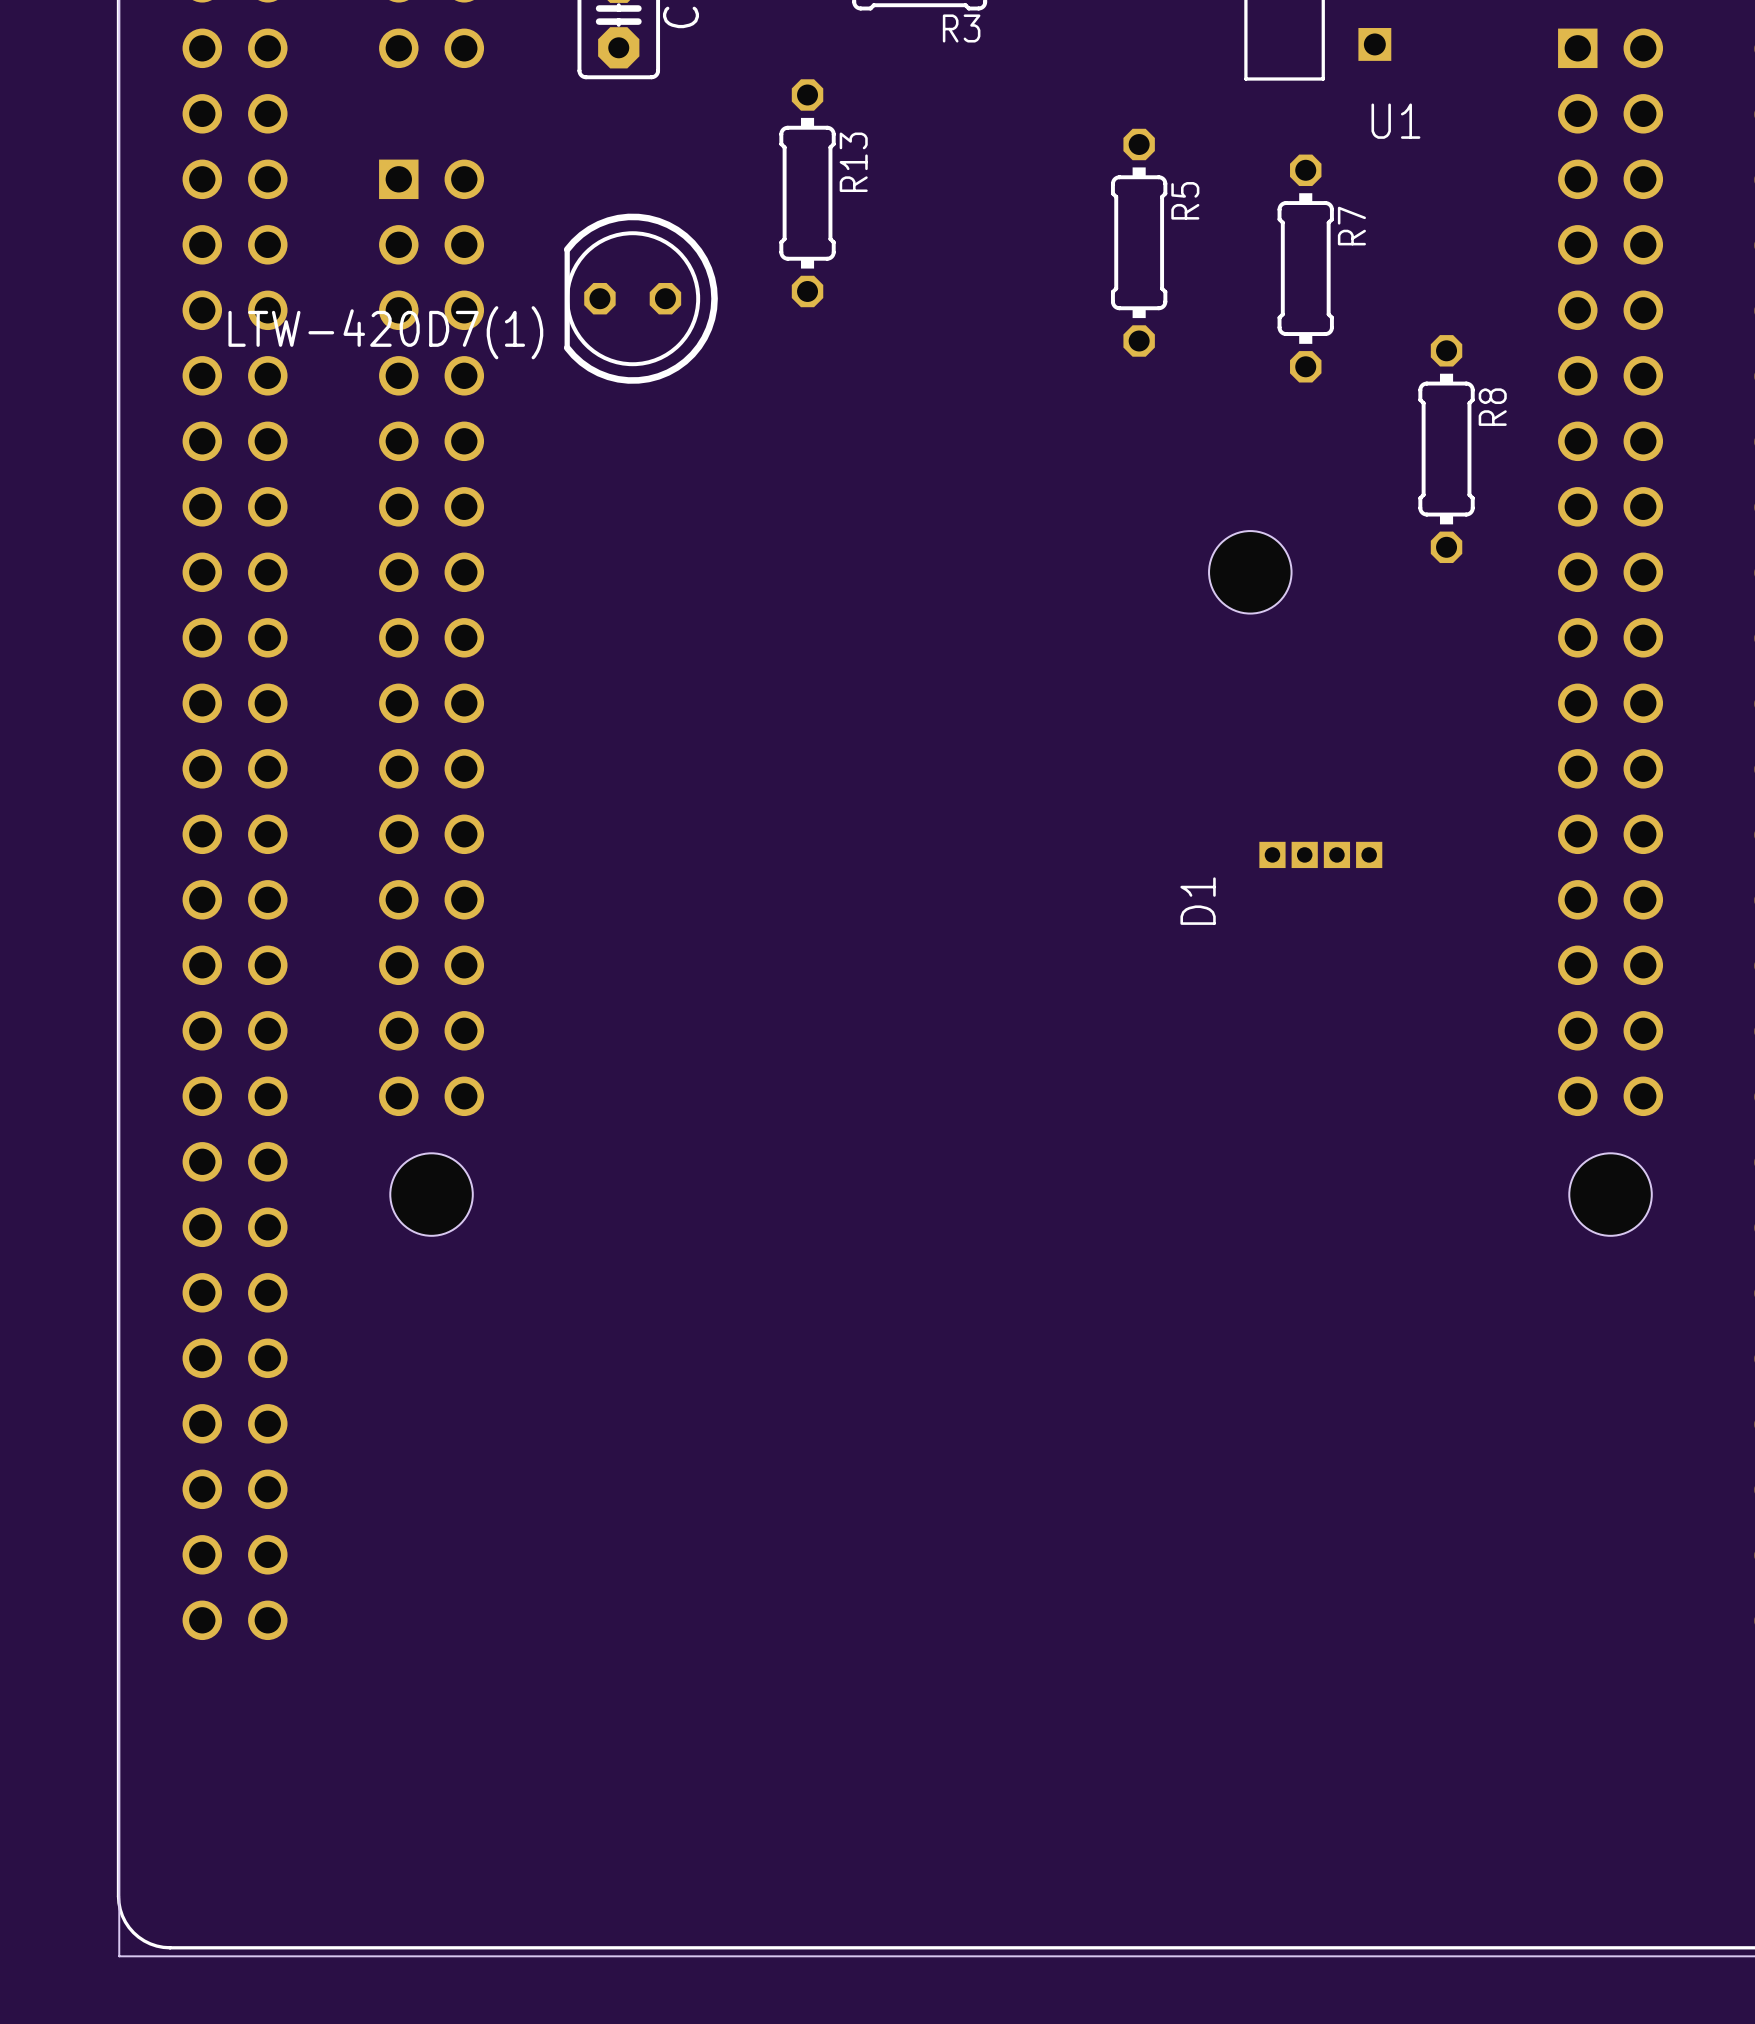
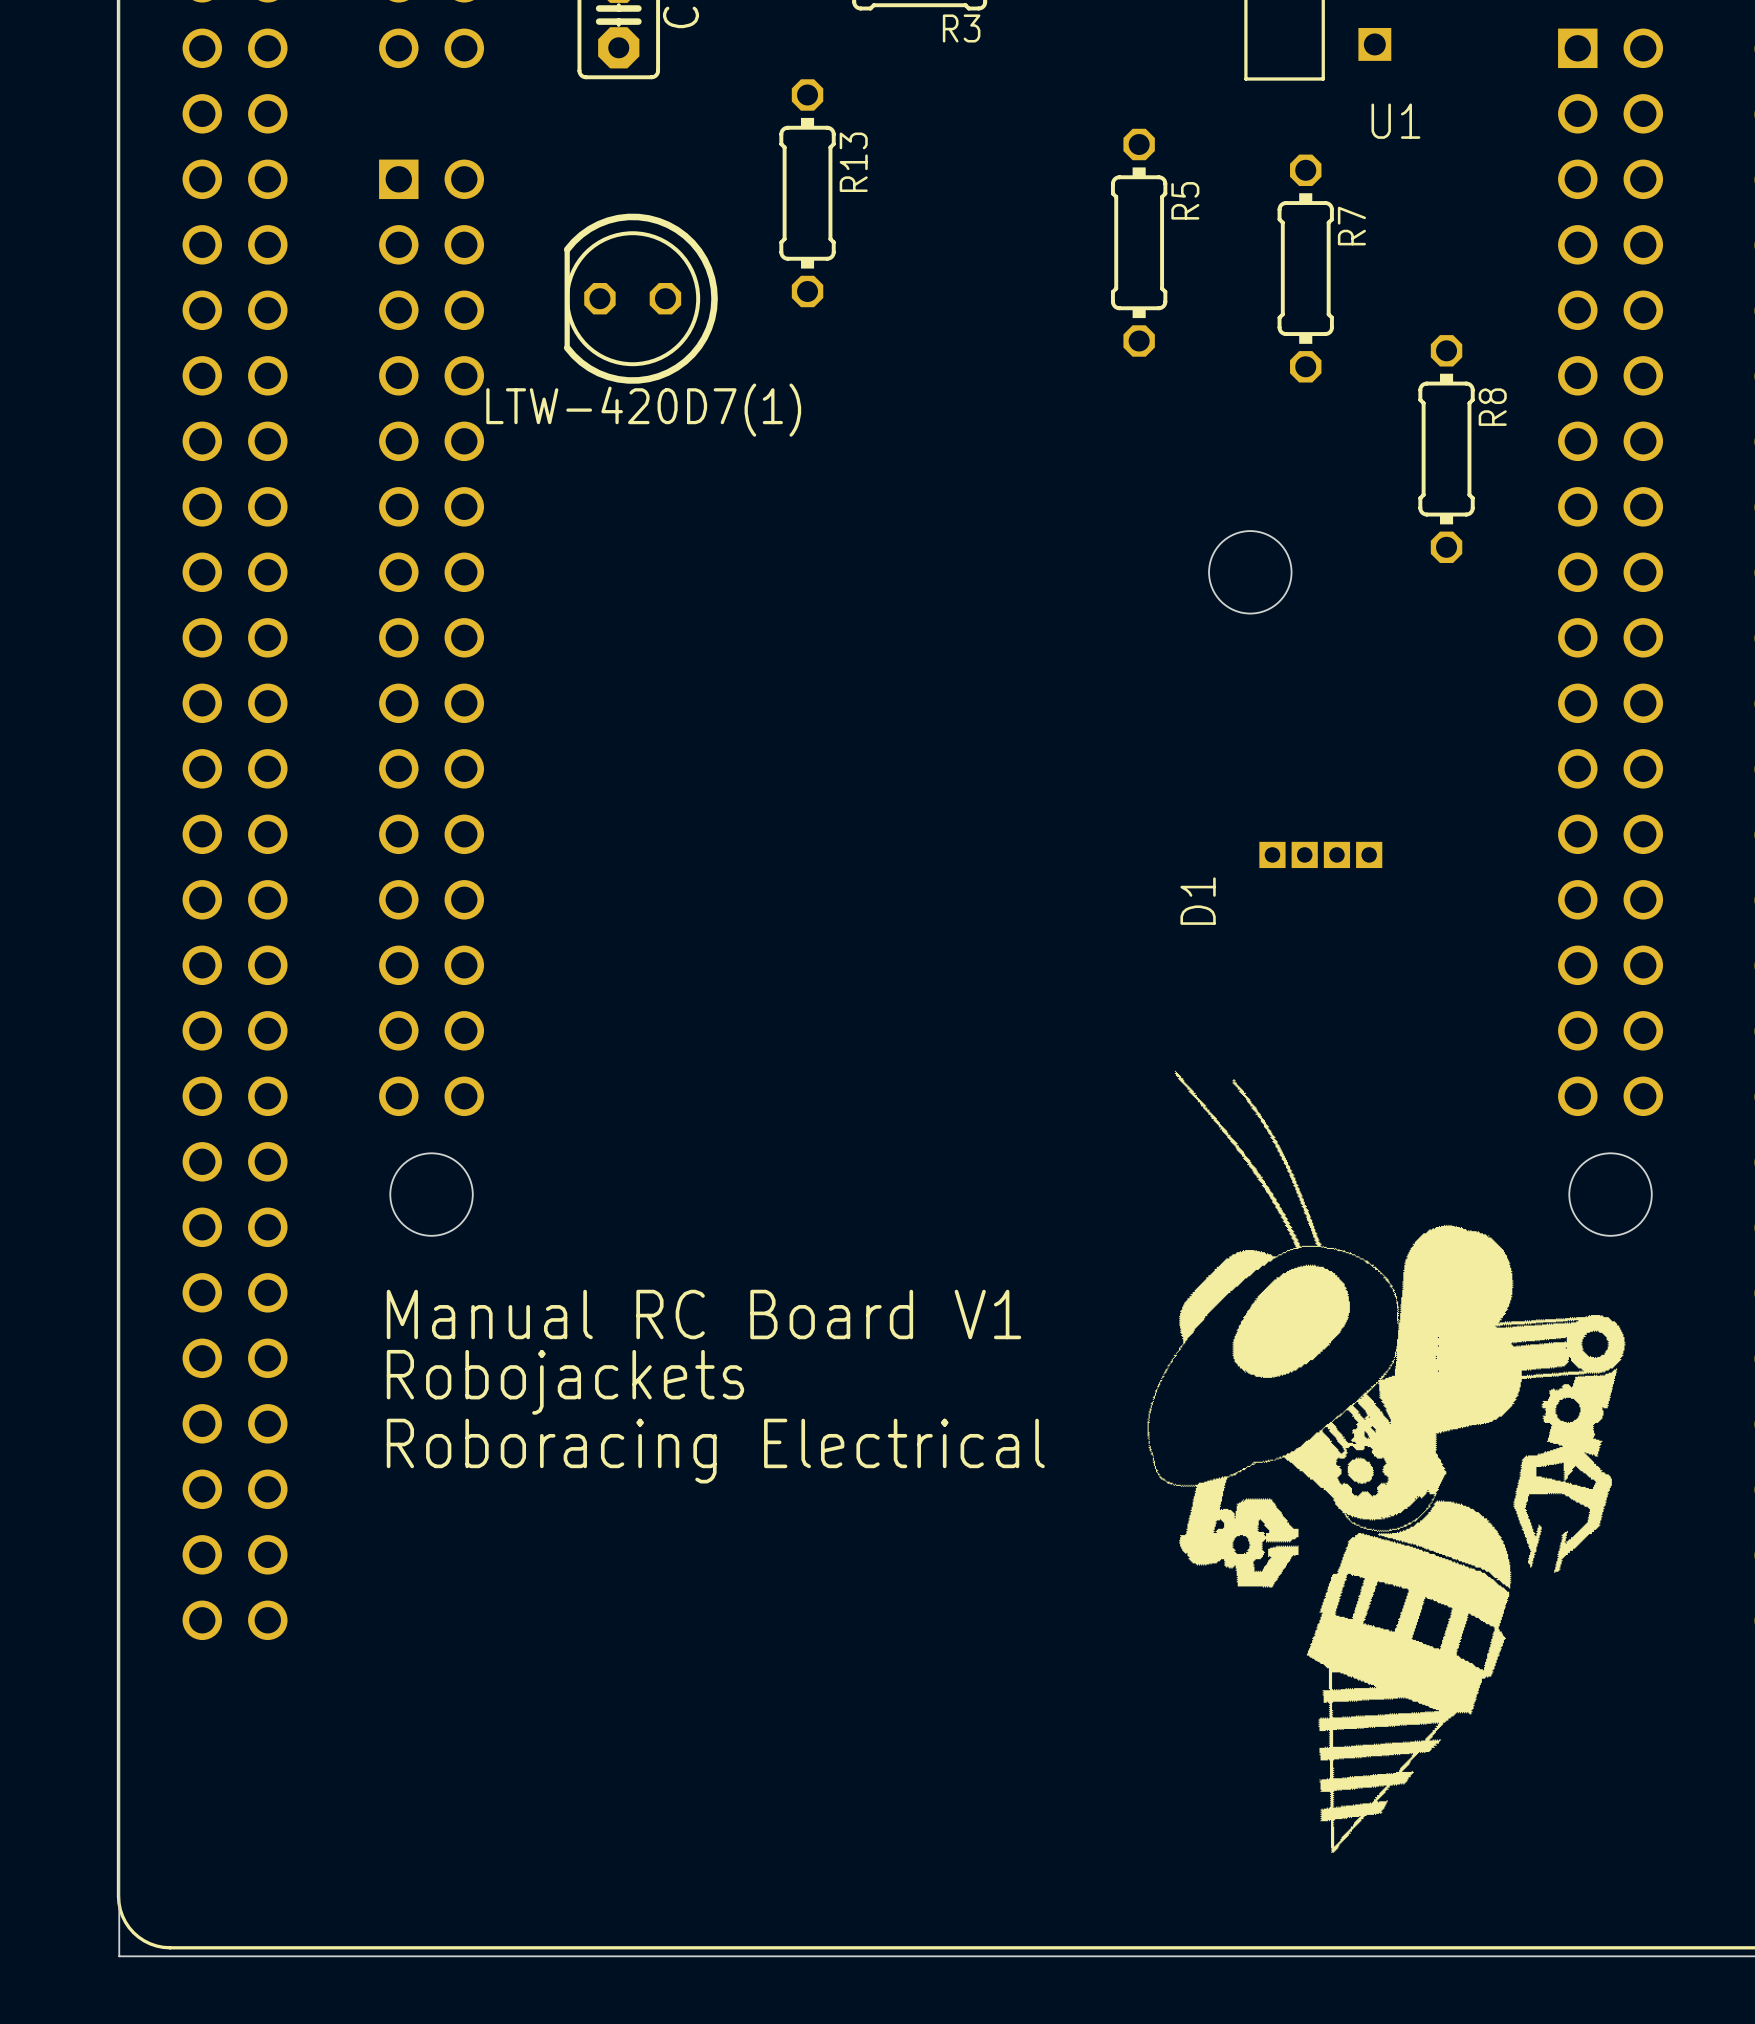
LTW-420D7(1) name position: LTW-420D7(1) (385, 332) -> LTW-420D7(1) (643, 410)
drawing: none -> [1147, 1070, 1626, 1853]
text: none -> Manual RC Board V1 (703, 1314)
text: none -> Robojackets (565, 1382)
text: none -> Roboracing Electrical (715, 1451)

